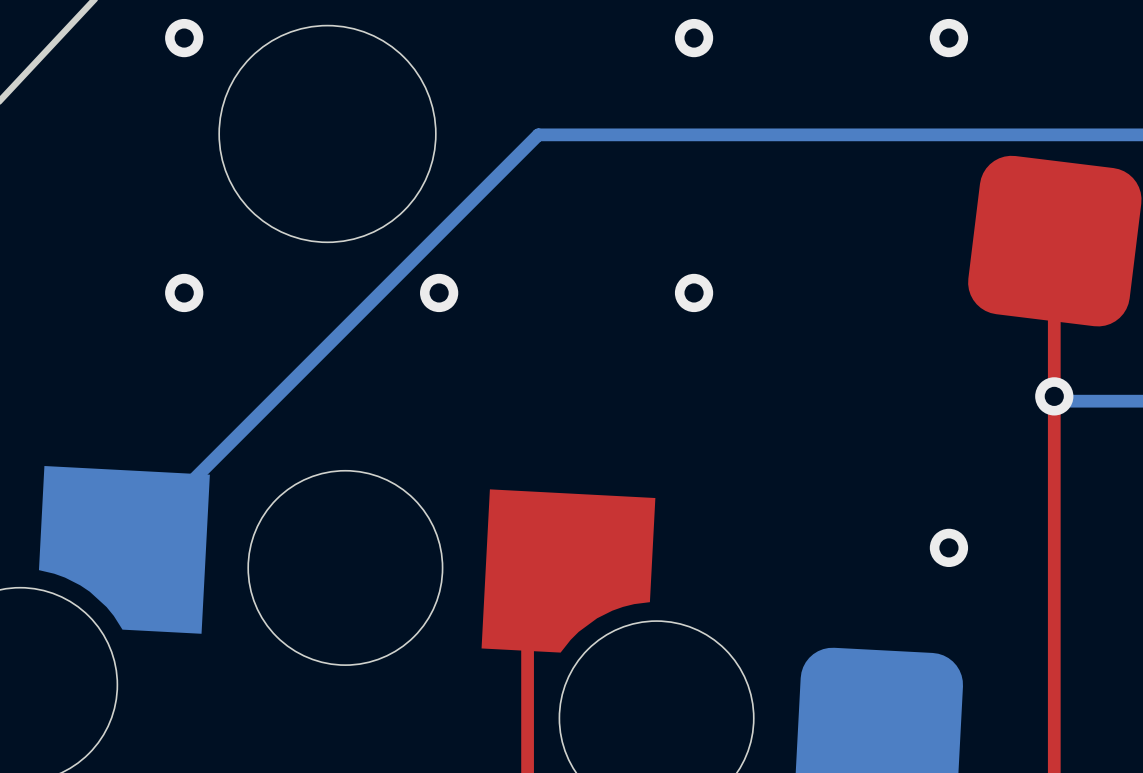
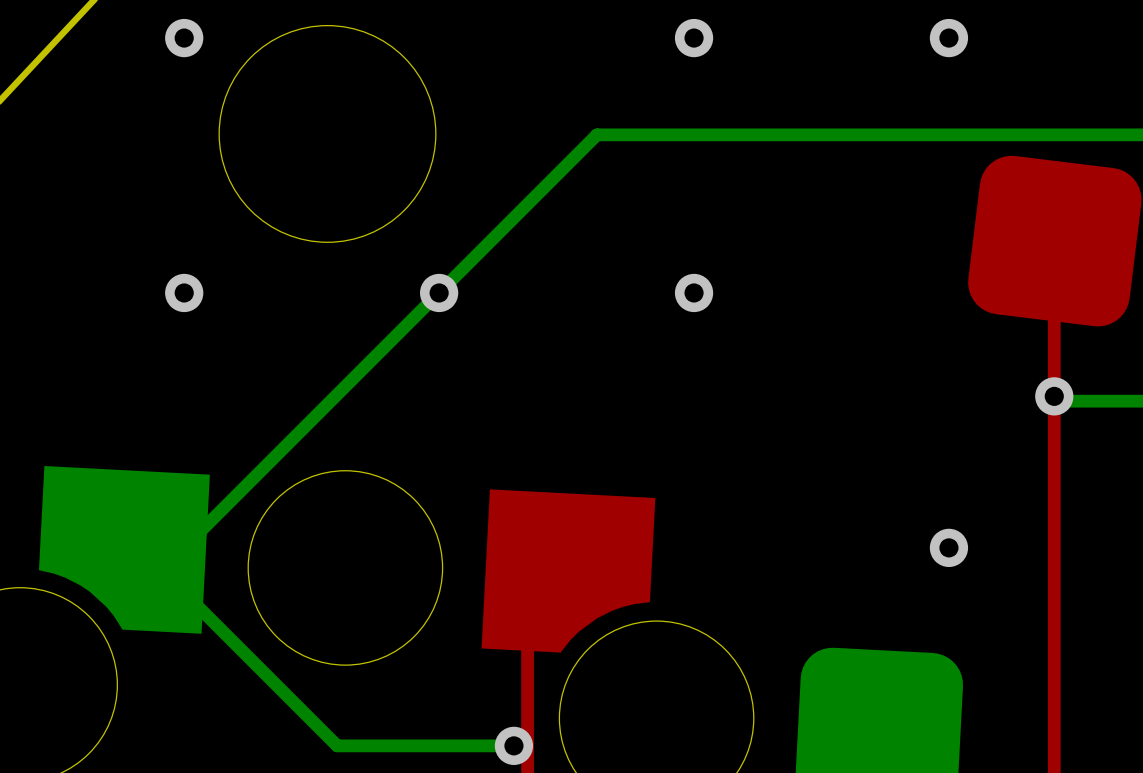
bottom track: (596, 134) (538, 134) (123, 549) -> (596, 134) (161, 570)
bottom track: none -> (161, 570) (337, 745) (513, 745)
via: none -> (513, 745)

